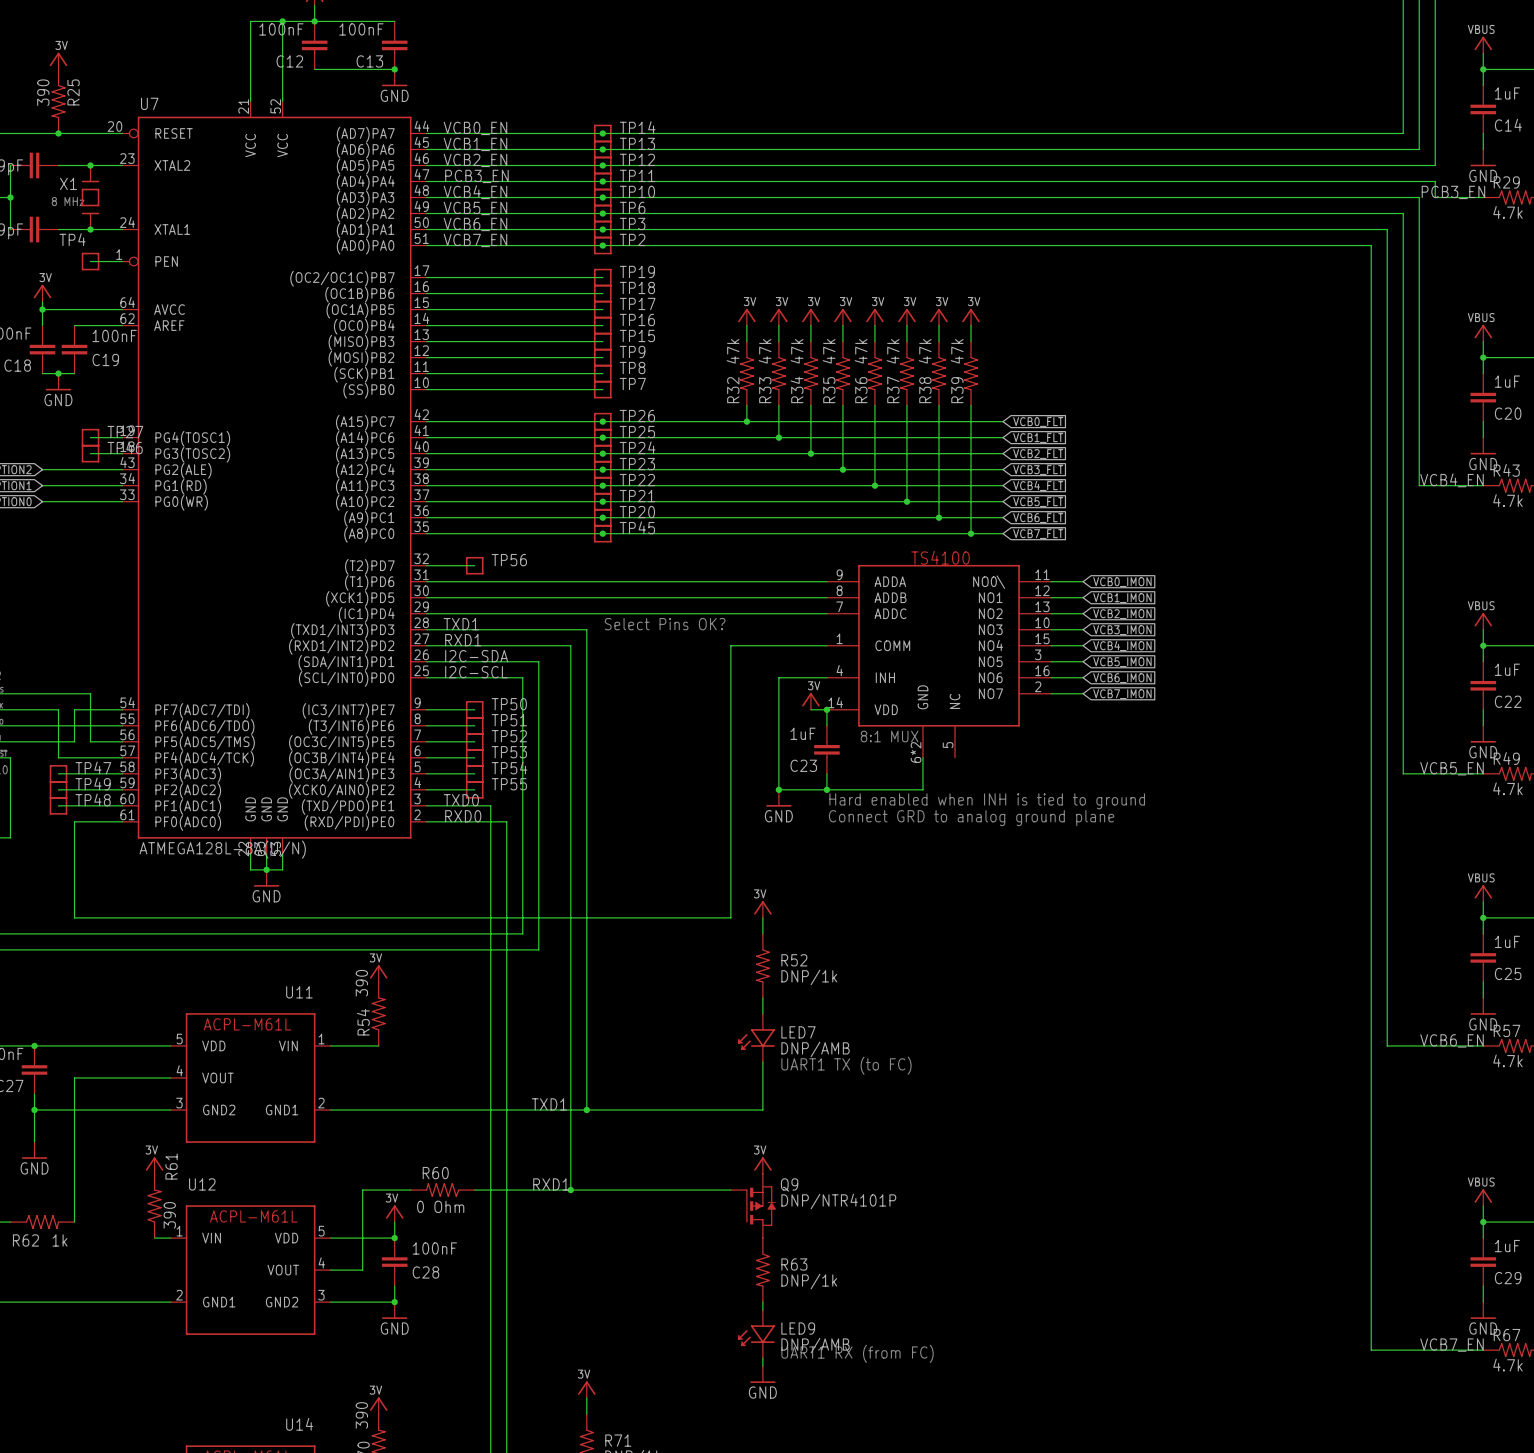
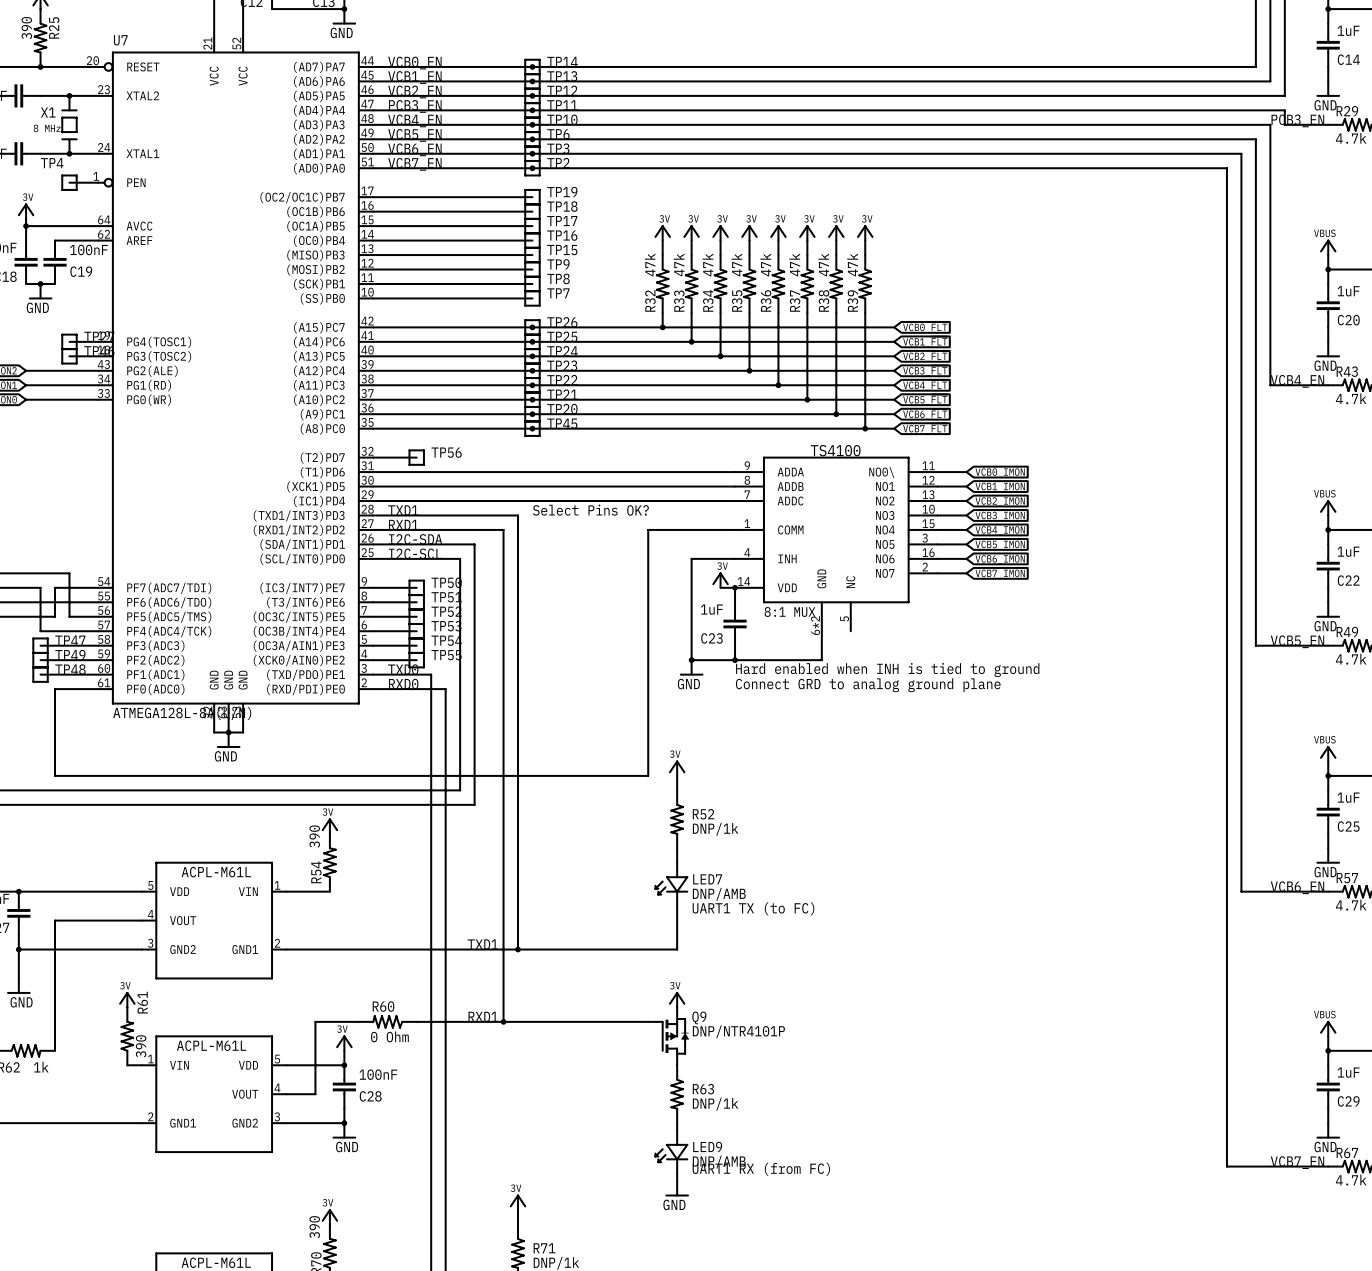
U11 name: U11 (299, 992) -> none
U12 name: U12 (202, 1184) -> none
U14 name: U14 (299, 1424) -> none

